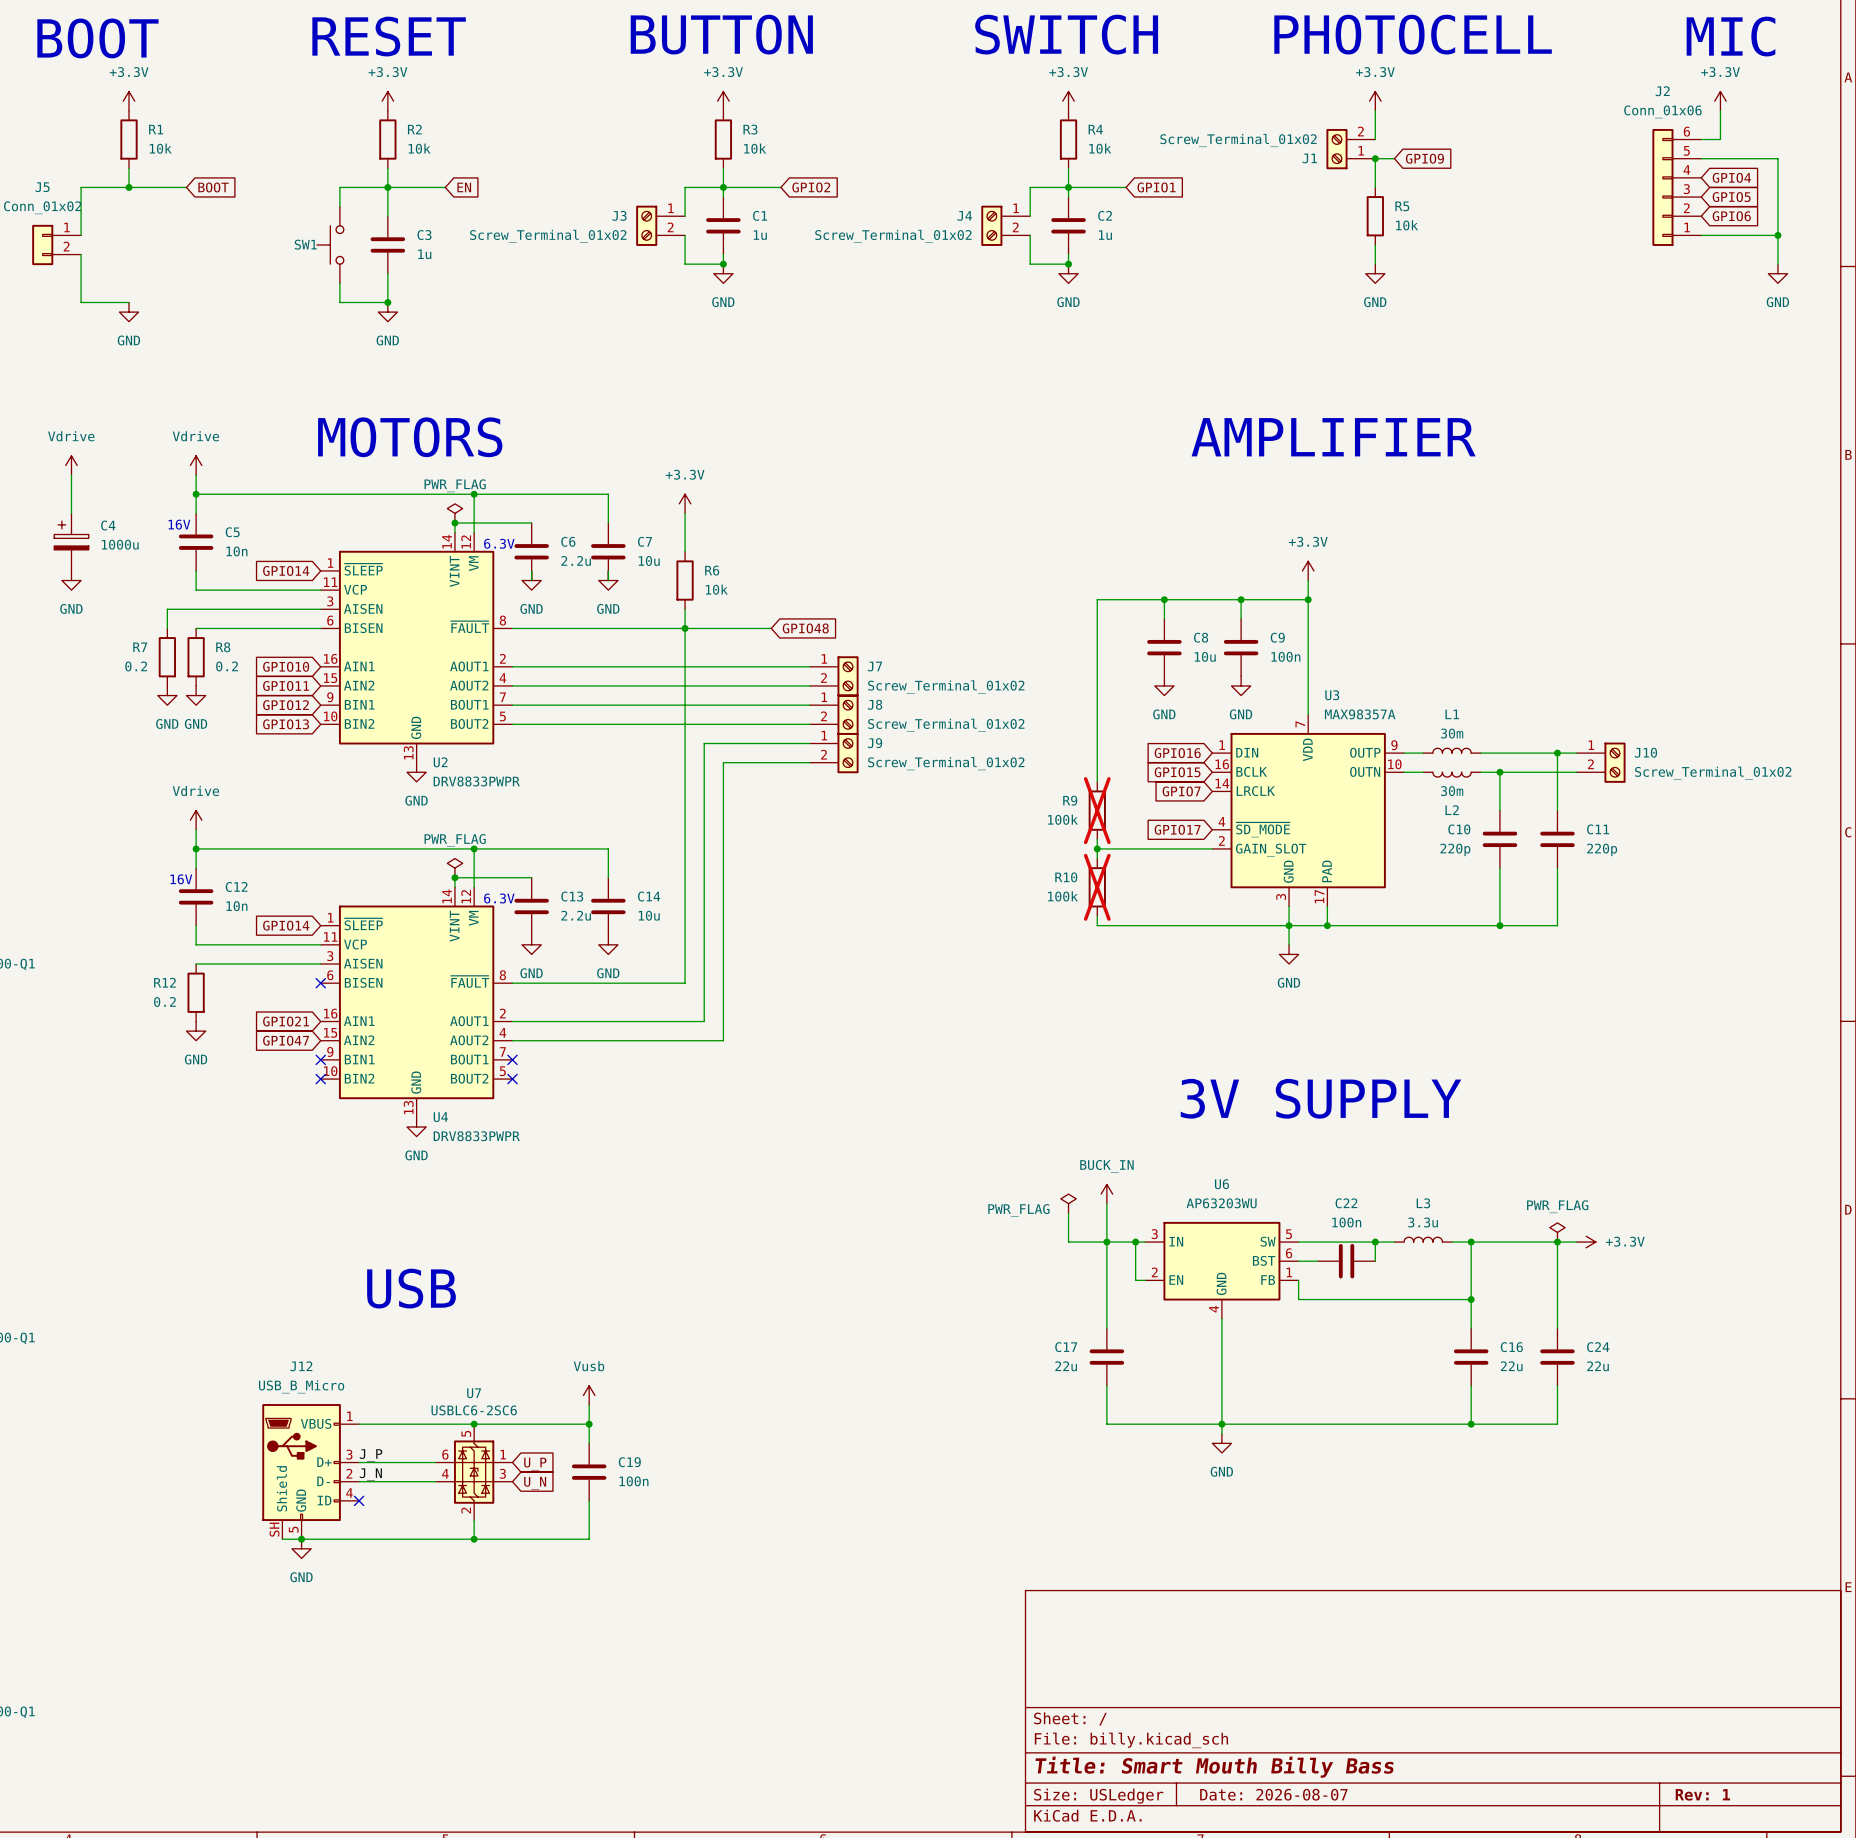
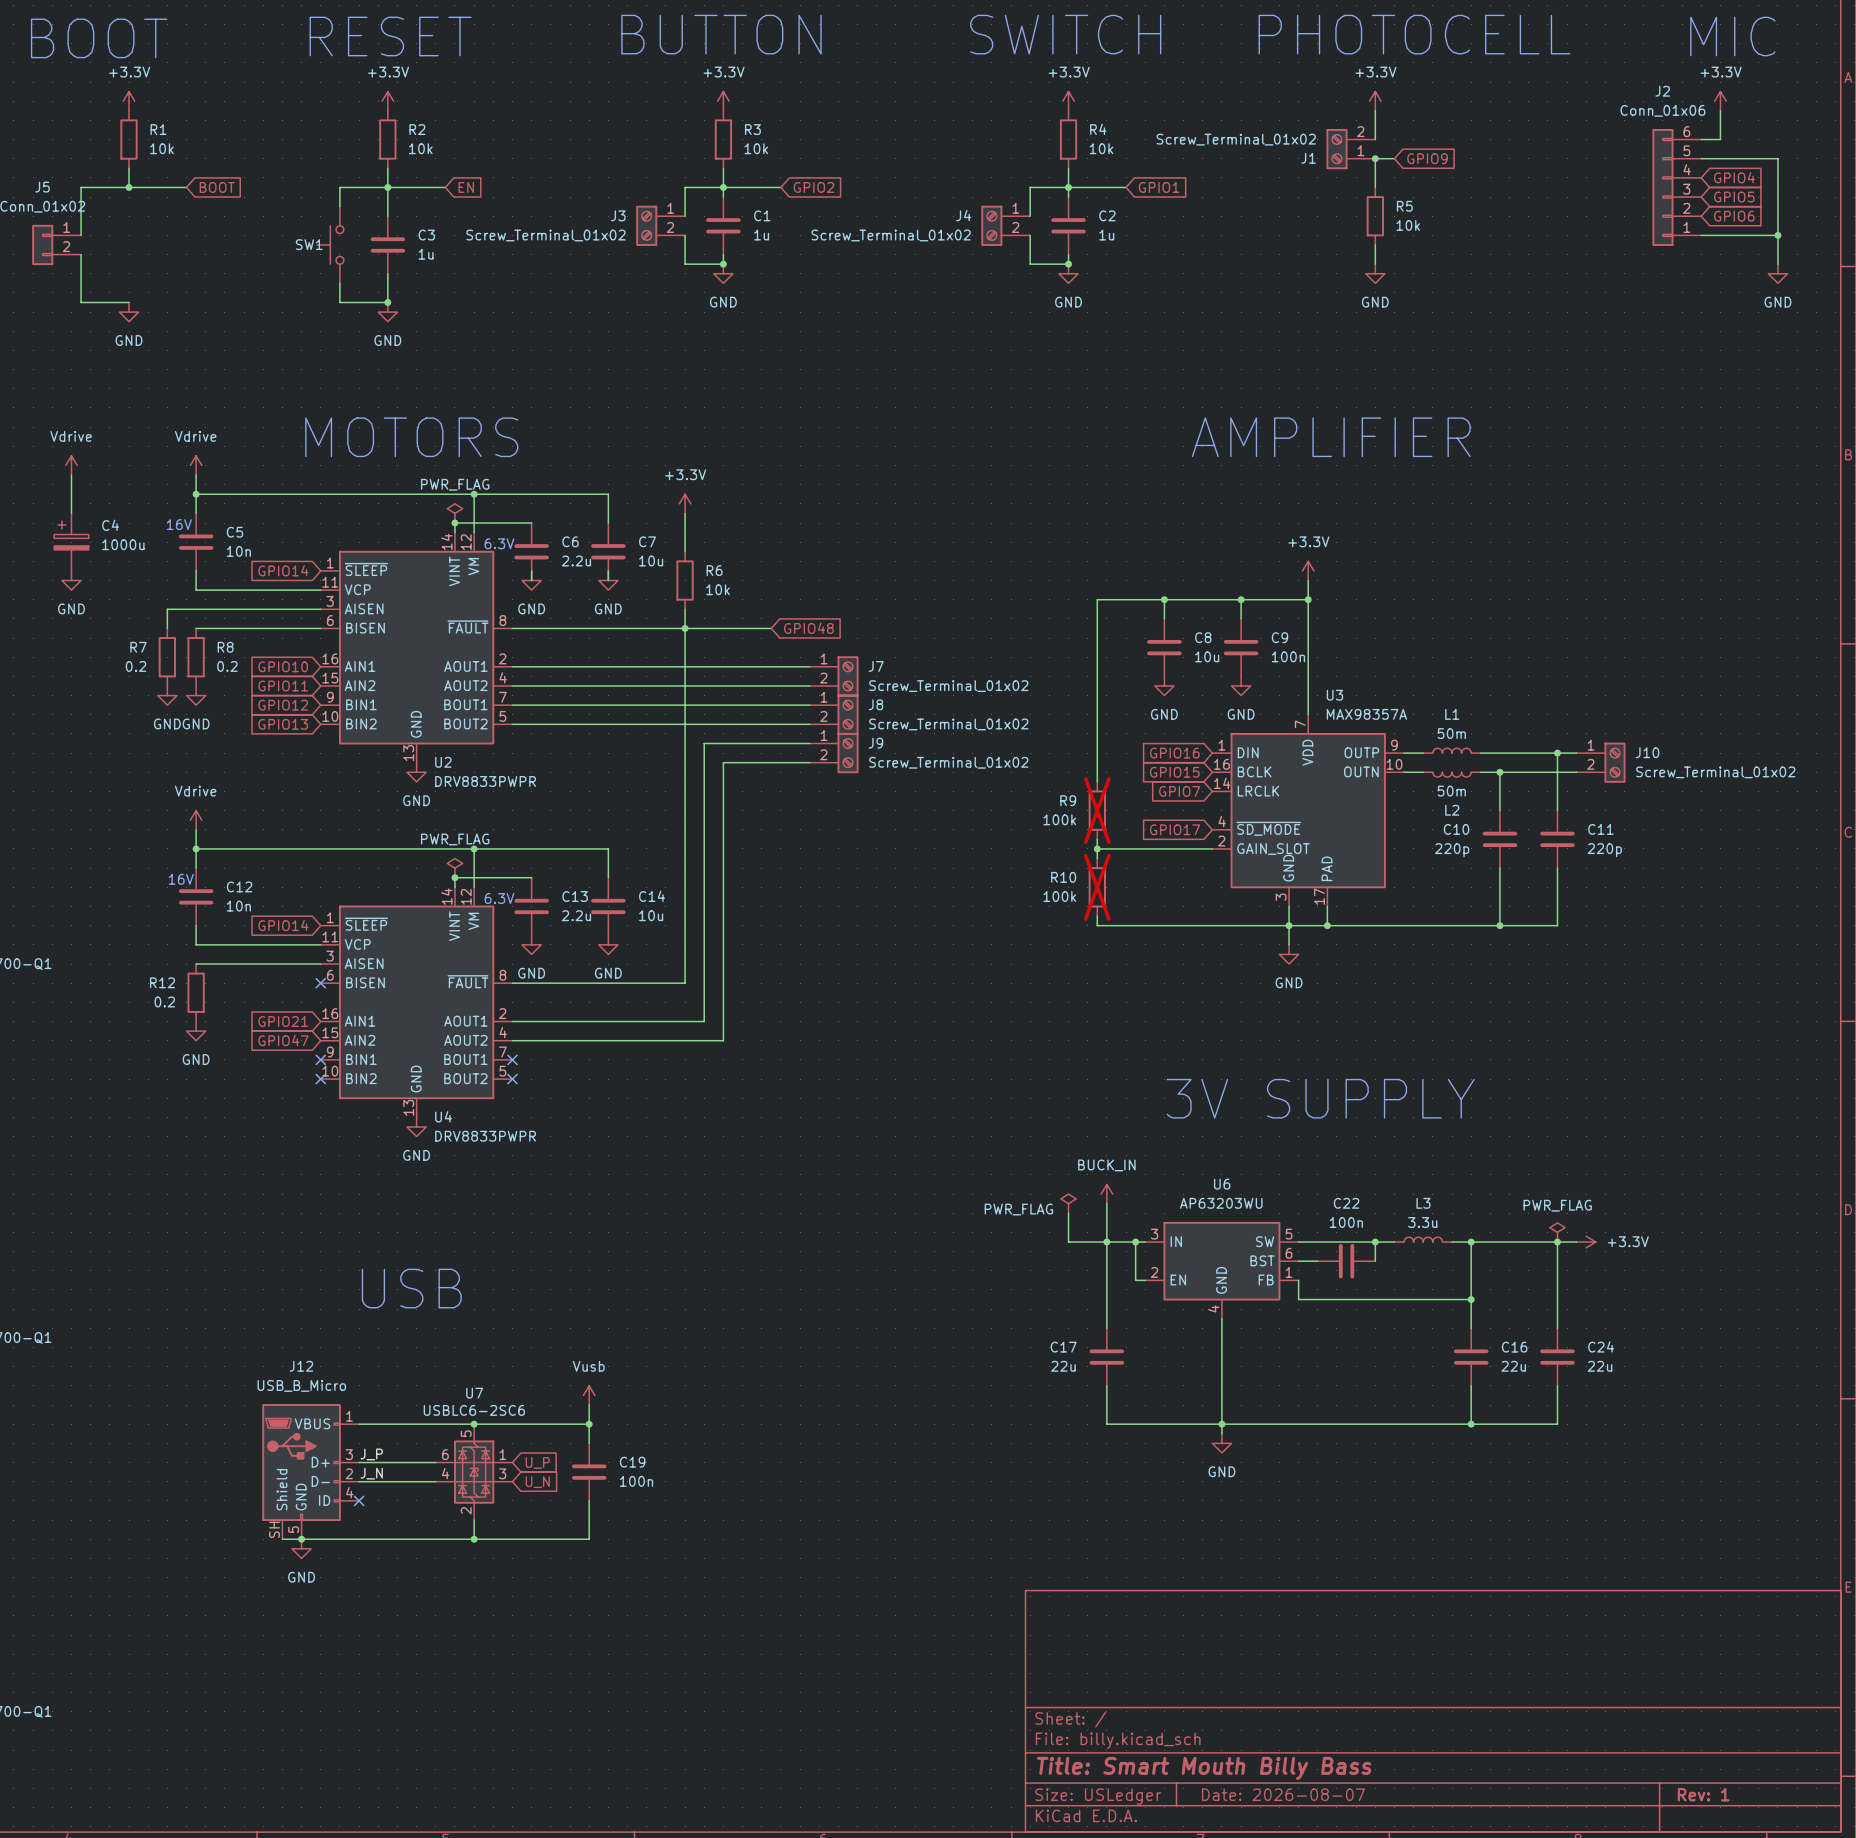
L1 value: 30m (1452, 733) -> 50m (1451, 733)
L2 value: 30m (1452, 791) -> 50m (1451, 791)

